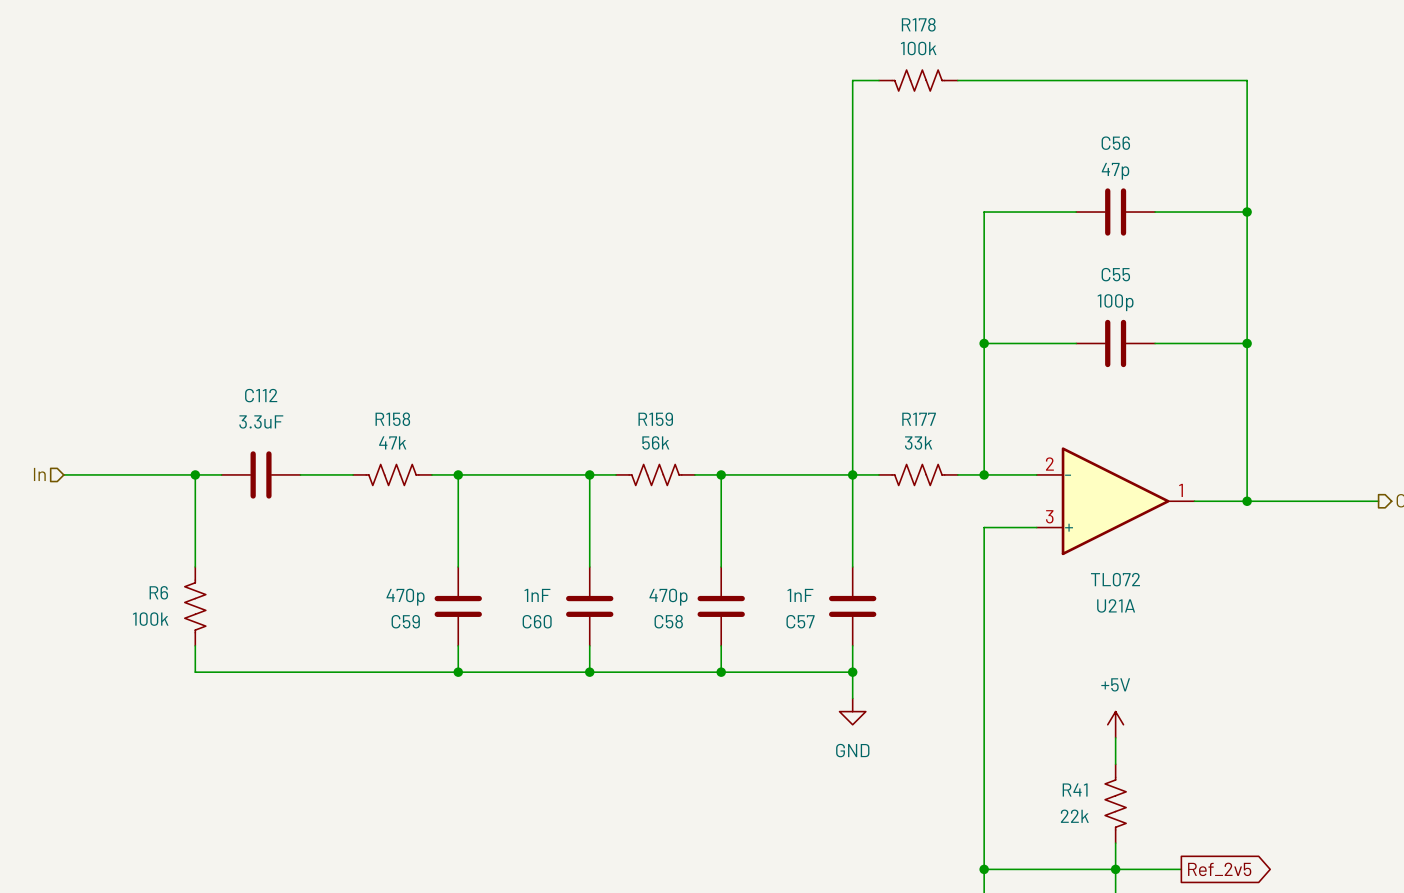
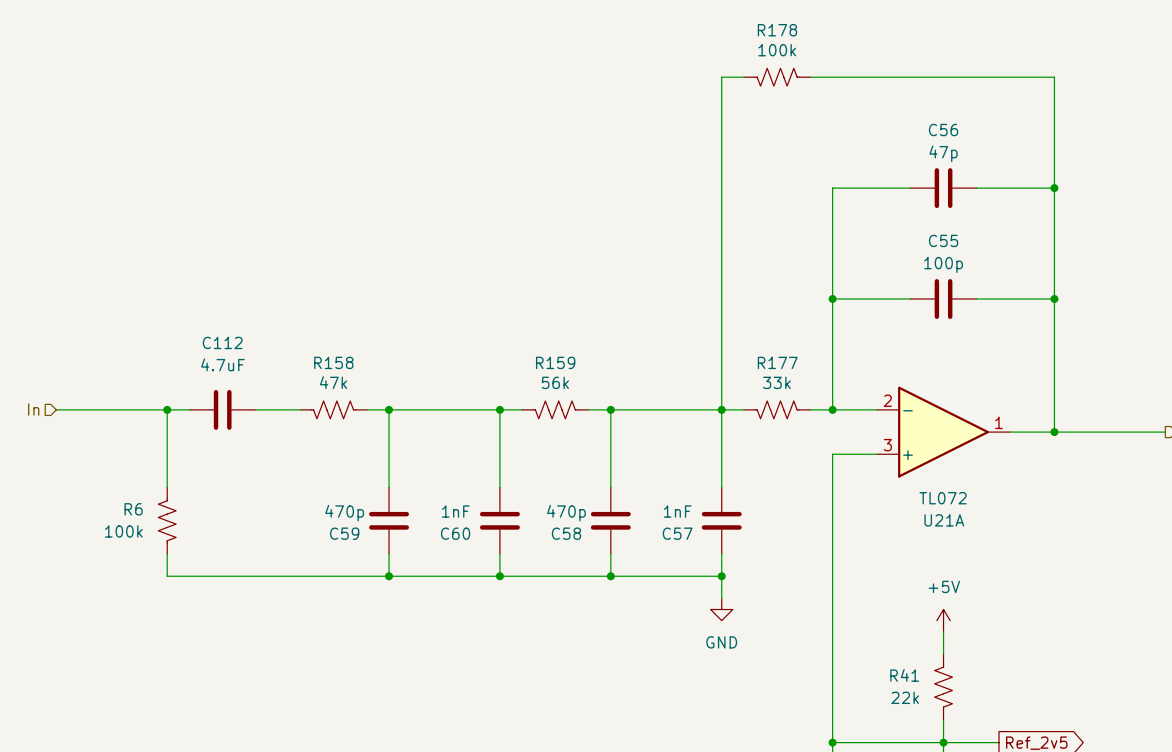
C112 value: 3.3uF (261, 421) -> 4.7uF (222, 364)

